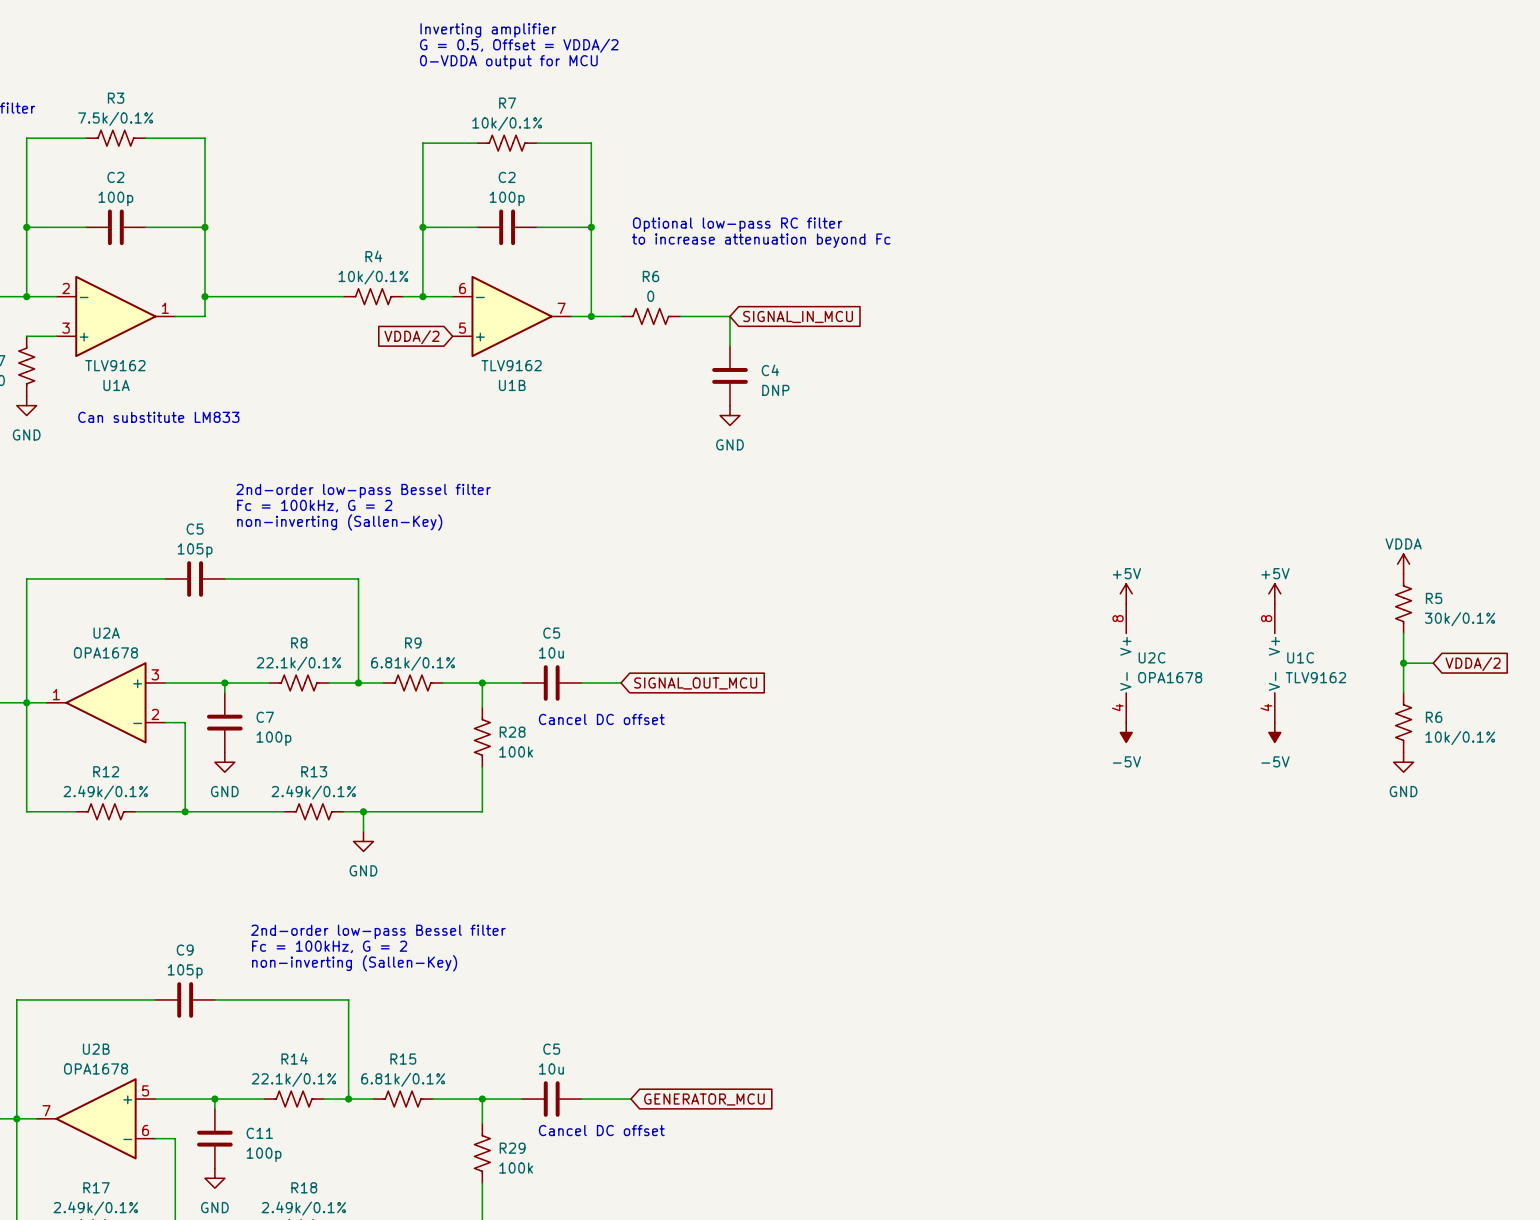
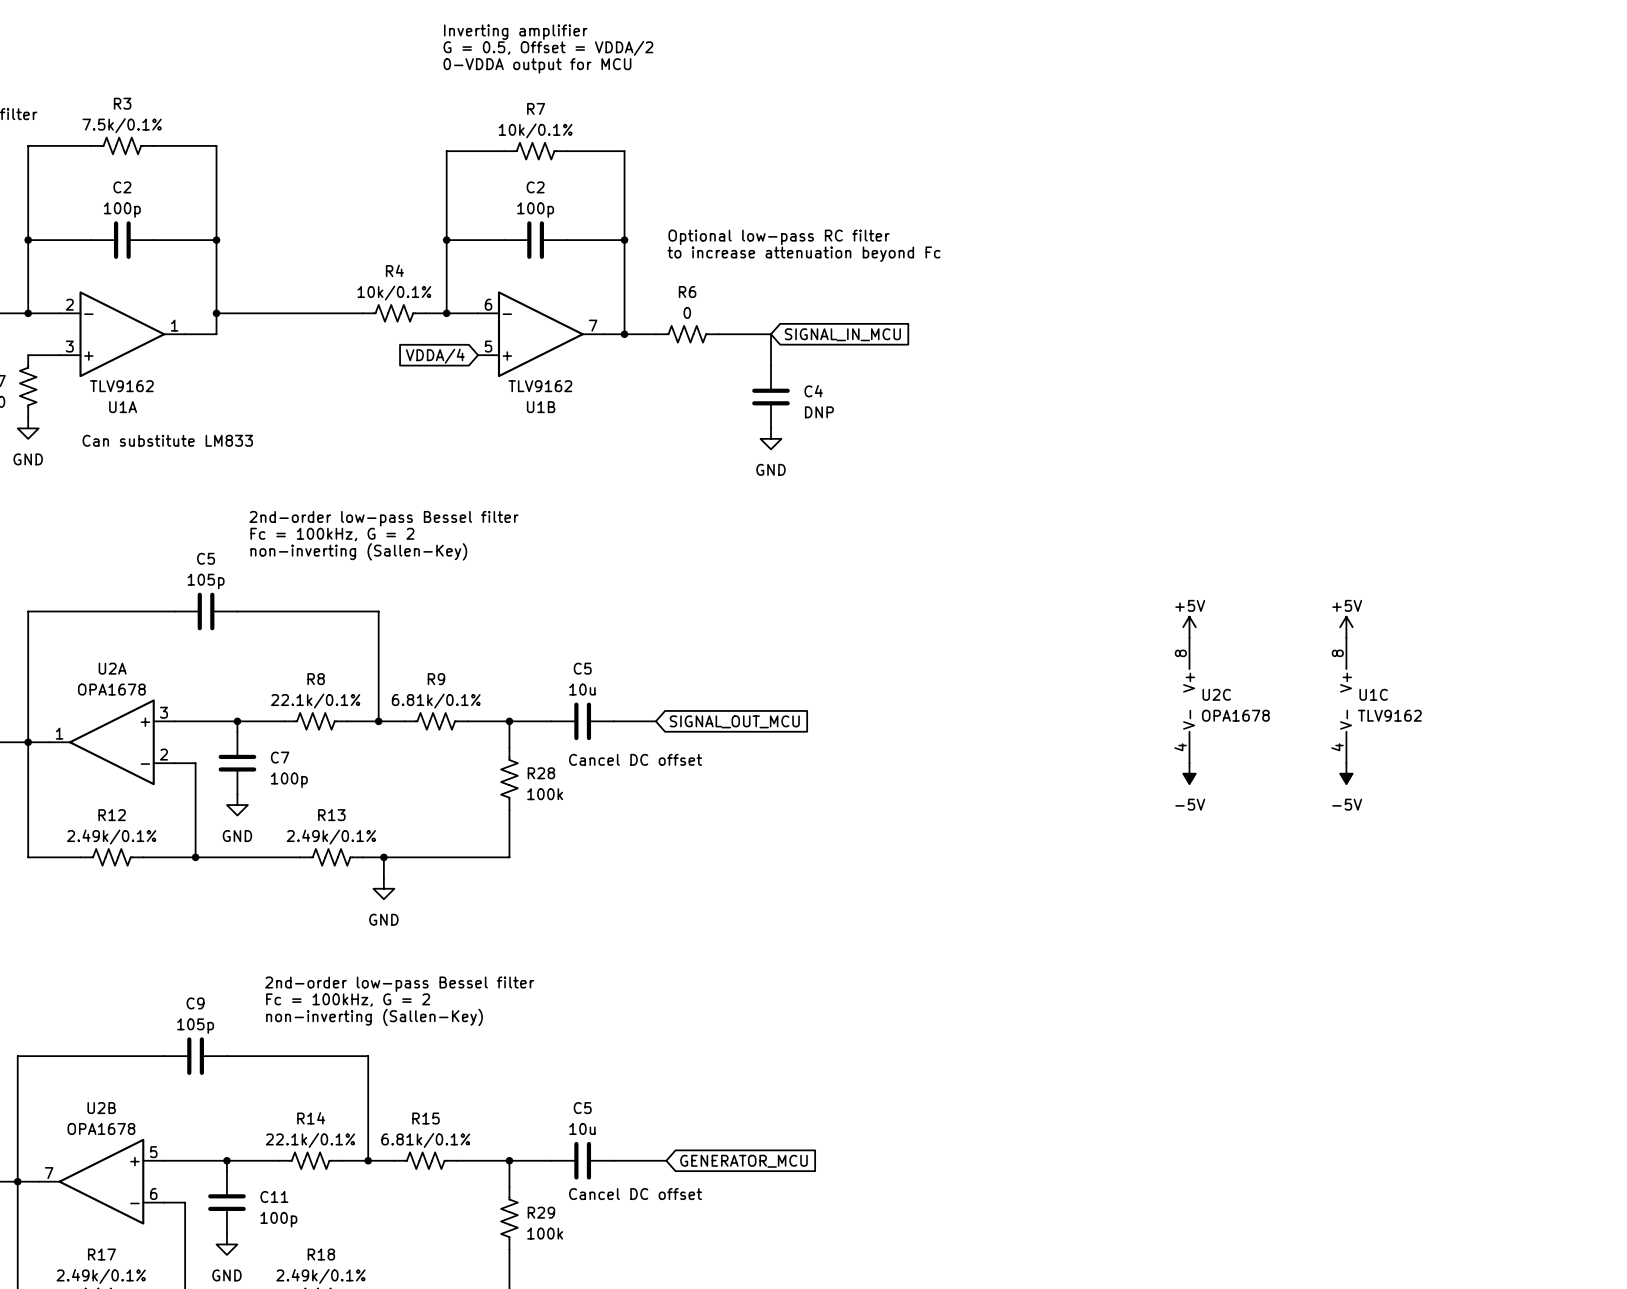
global label: VDDA/2 (411, 337) -> VDDA/4 (435, 356)
power symbol: VDDA (1403, 564) -> none
R5: 30k/0.1% (1403, 603) -> none
wire: (1403, 633) (1403, 692) -> none
wire: (1403, 663) (1433, 663) -> none
junction: (1403, 663) -> none
global label: VDDA/2 (1473, 664) -> none
R6: 10k/0.1% (1403, 722) -> none
power symbol: GND (1403, 762) -> none

